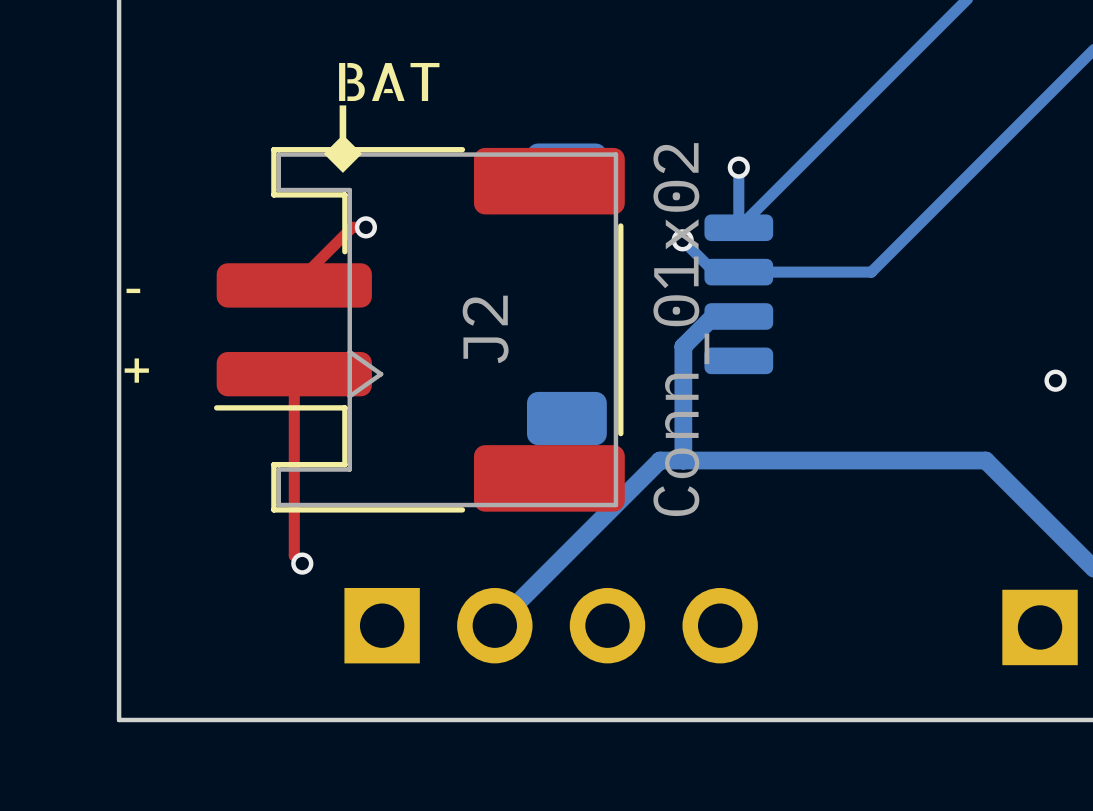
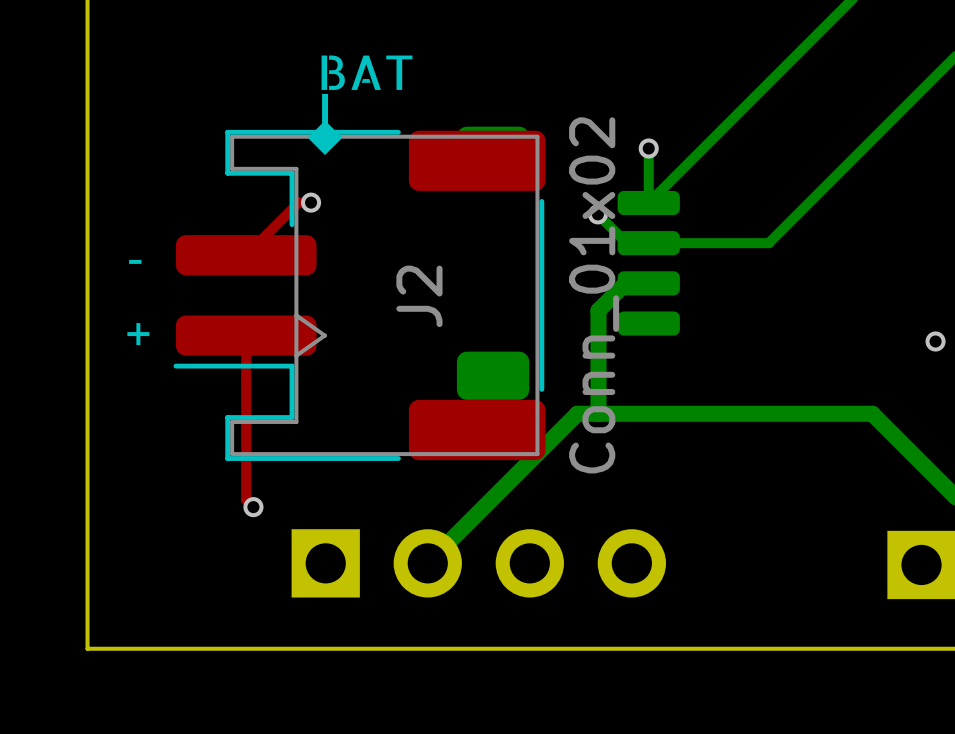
drawing position: (342, 81) -> (324, 72)
drawing position: (356, 81) -> (336, 72)
drawing position: (424, 81) -> (399, 72)
drawing position: (388, 82) -> (366, 72)
drawing position: (388, 91) -> (366, 80)
drawing position: (342, 139) -> (325, 124)
drawing position: (133, 290) -> (135, 261)
drawing position: (136, 370) -> (138, 334)

